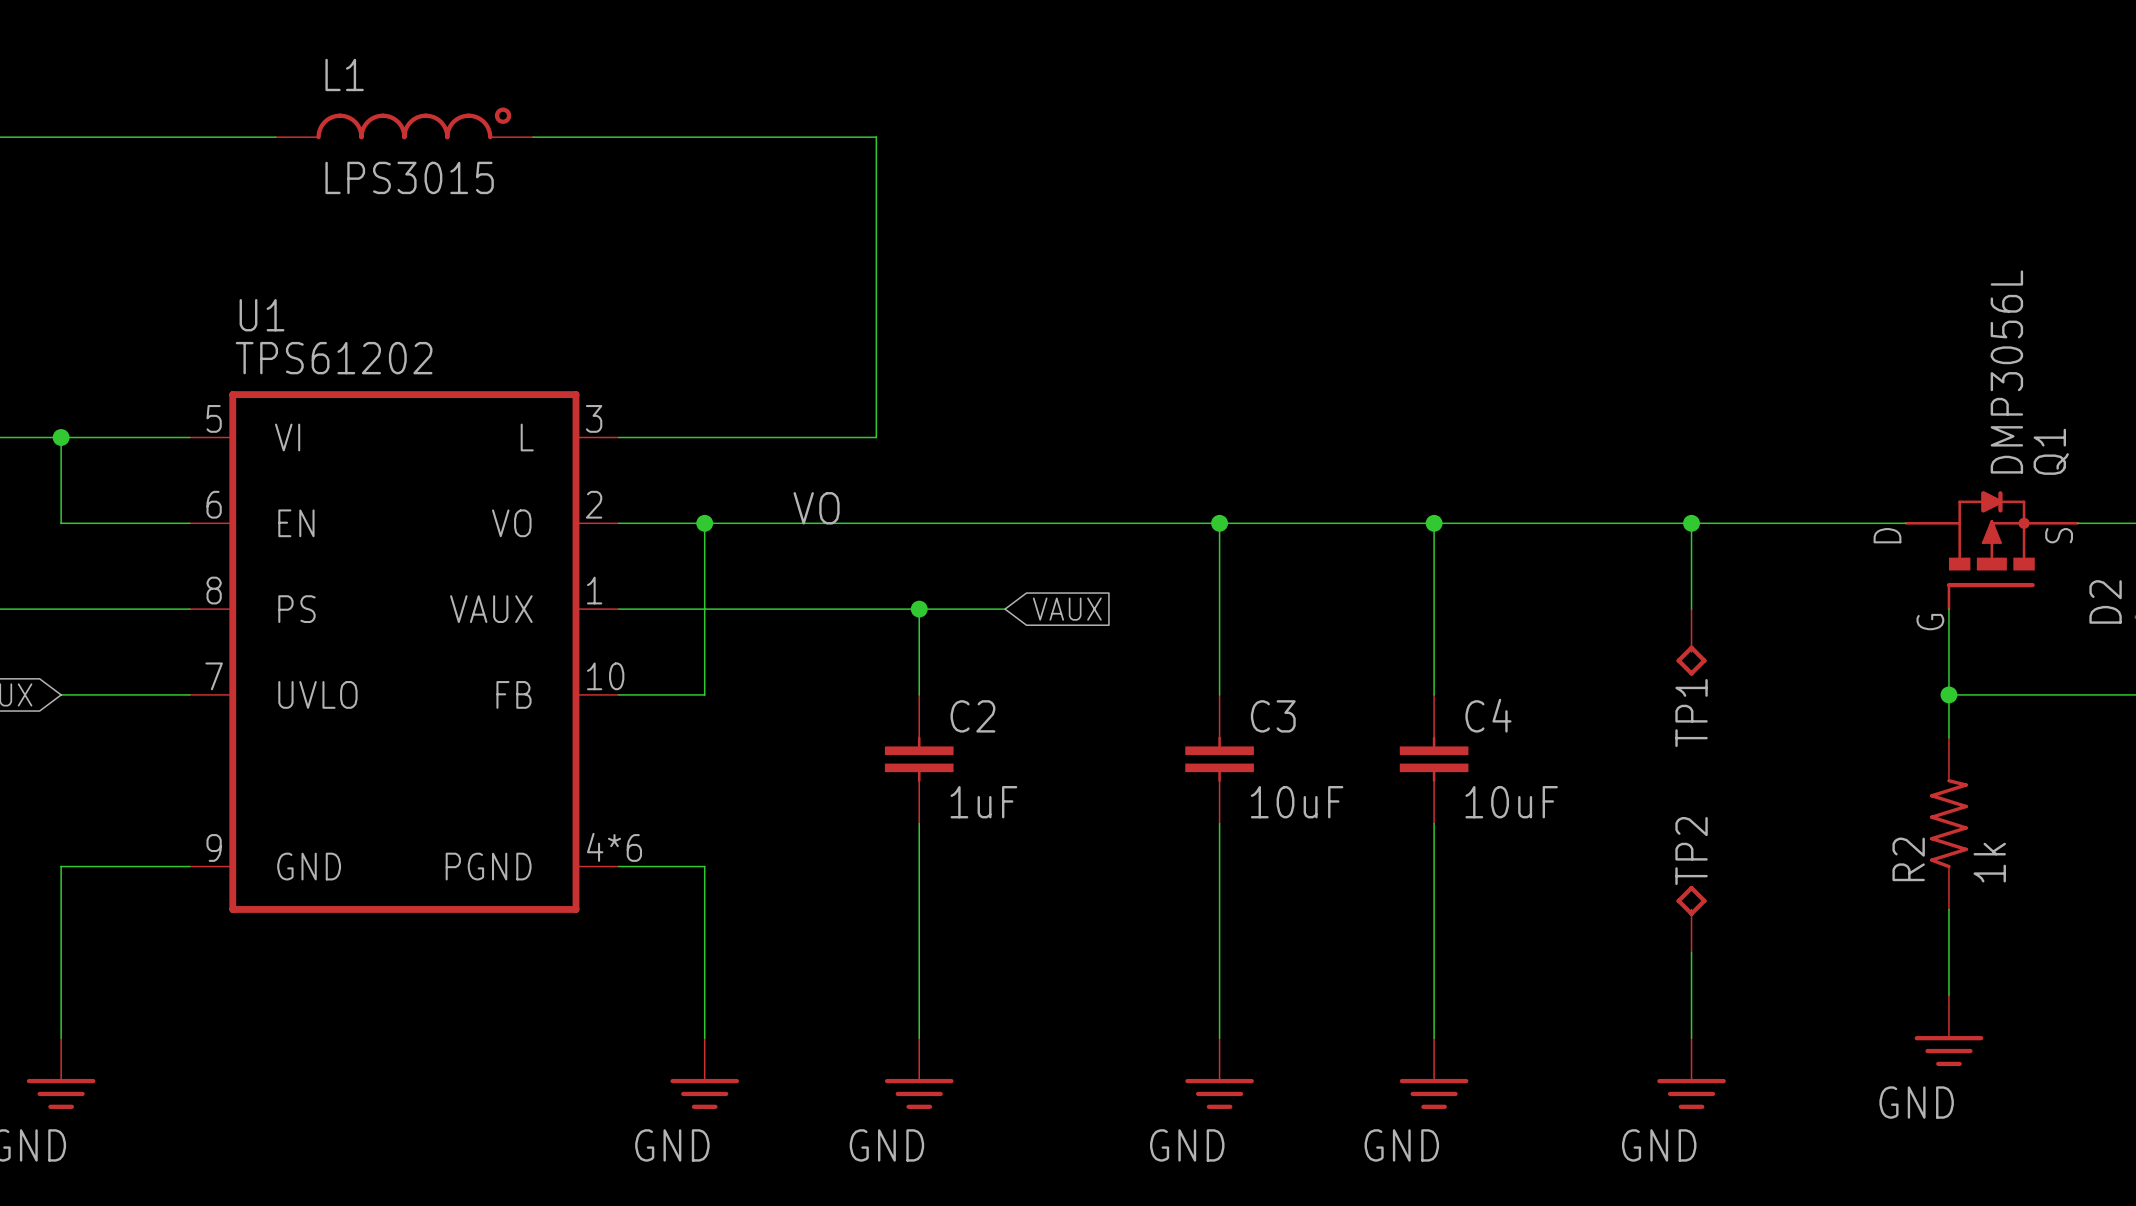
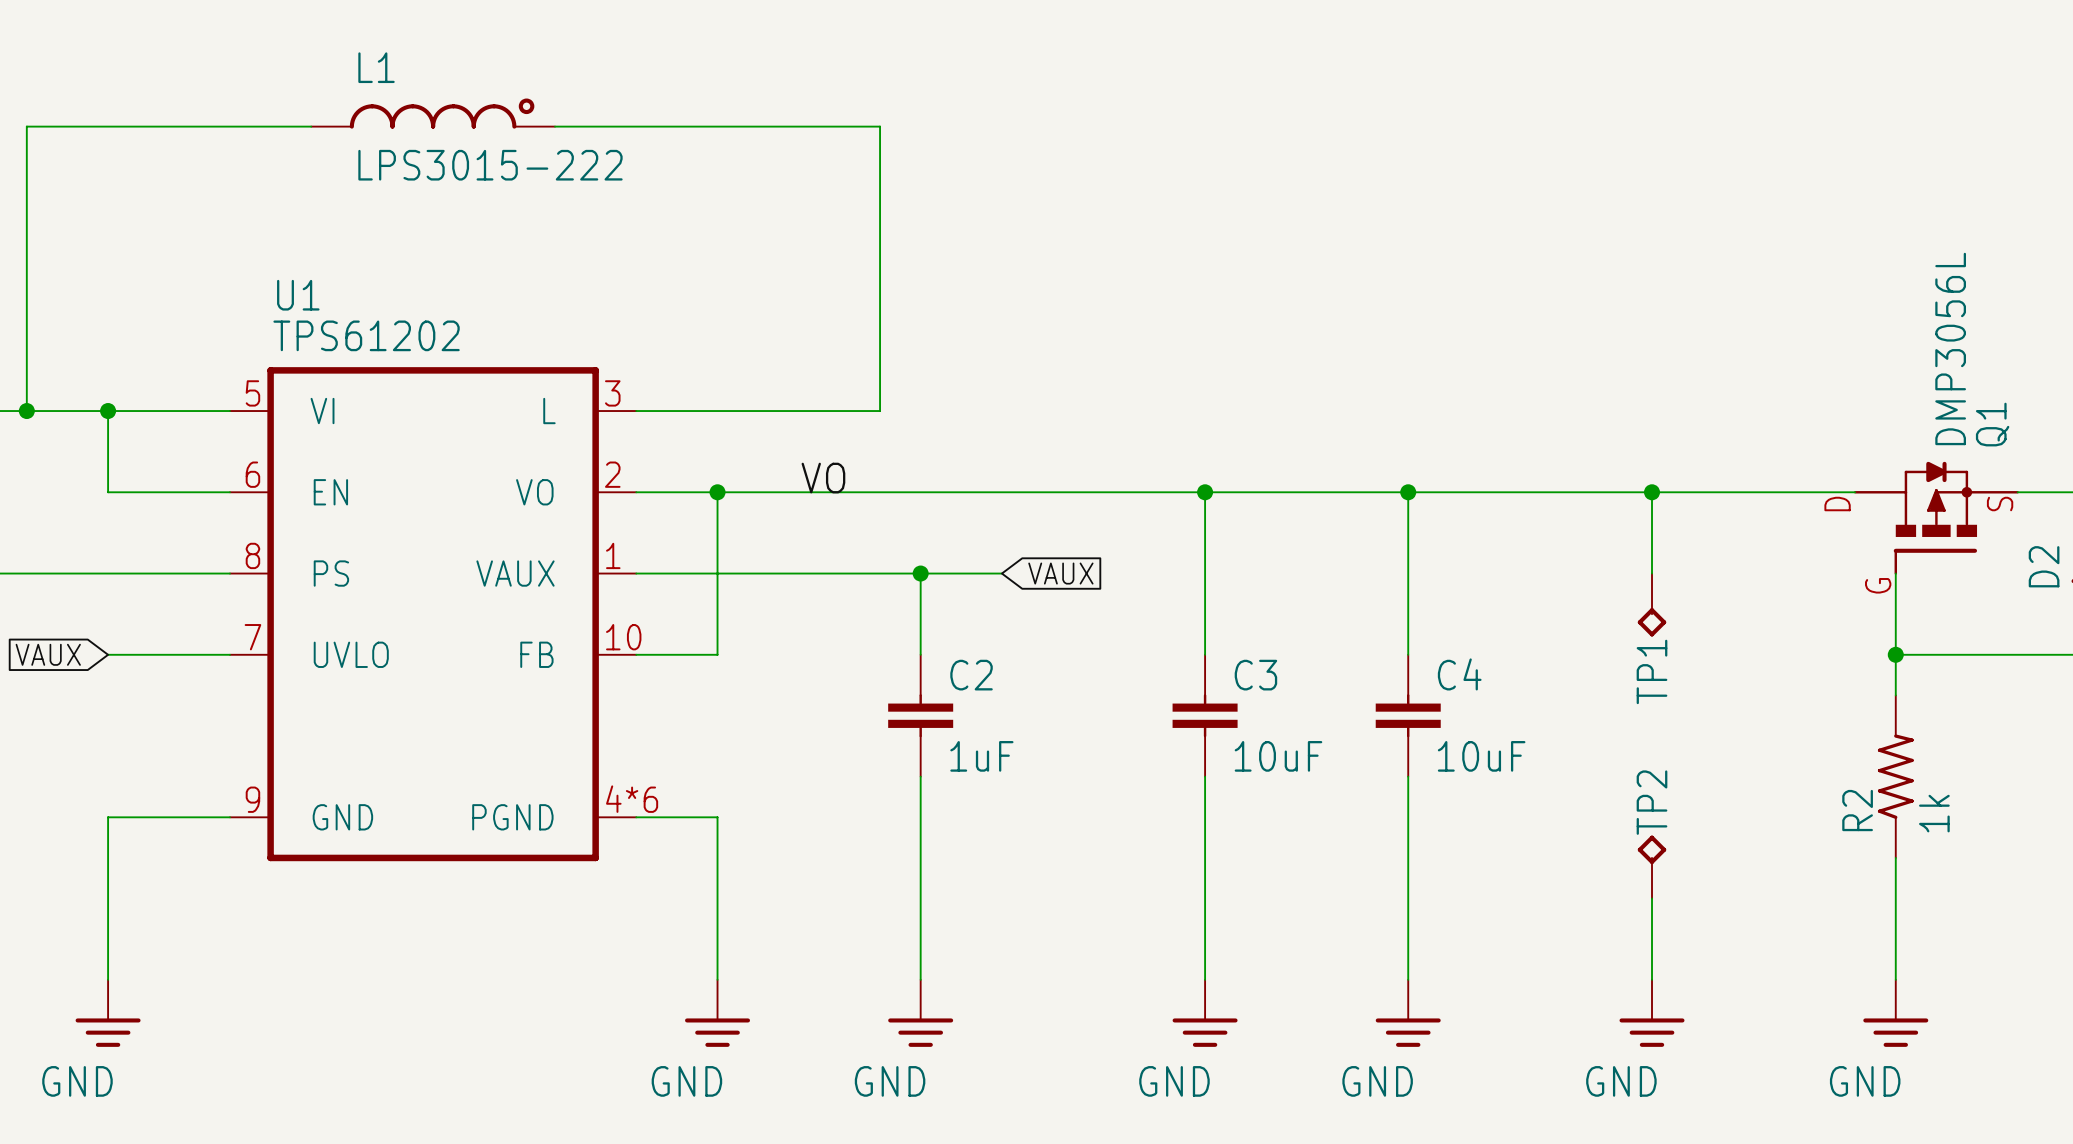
L1 value: LPS3015 (409, 177) -> LPS3015-222 (490, 165)
power symbol position: GND (1948, 1030) -> GND (1895, 1013)

